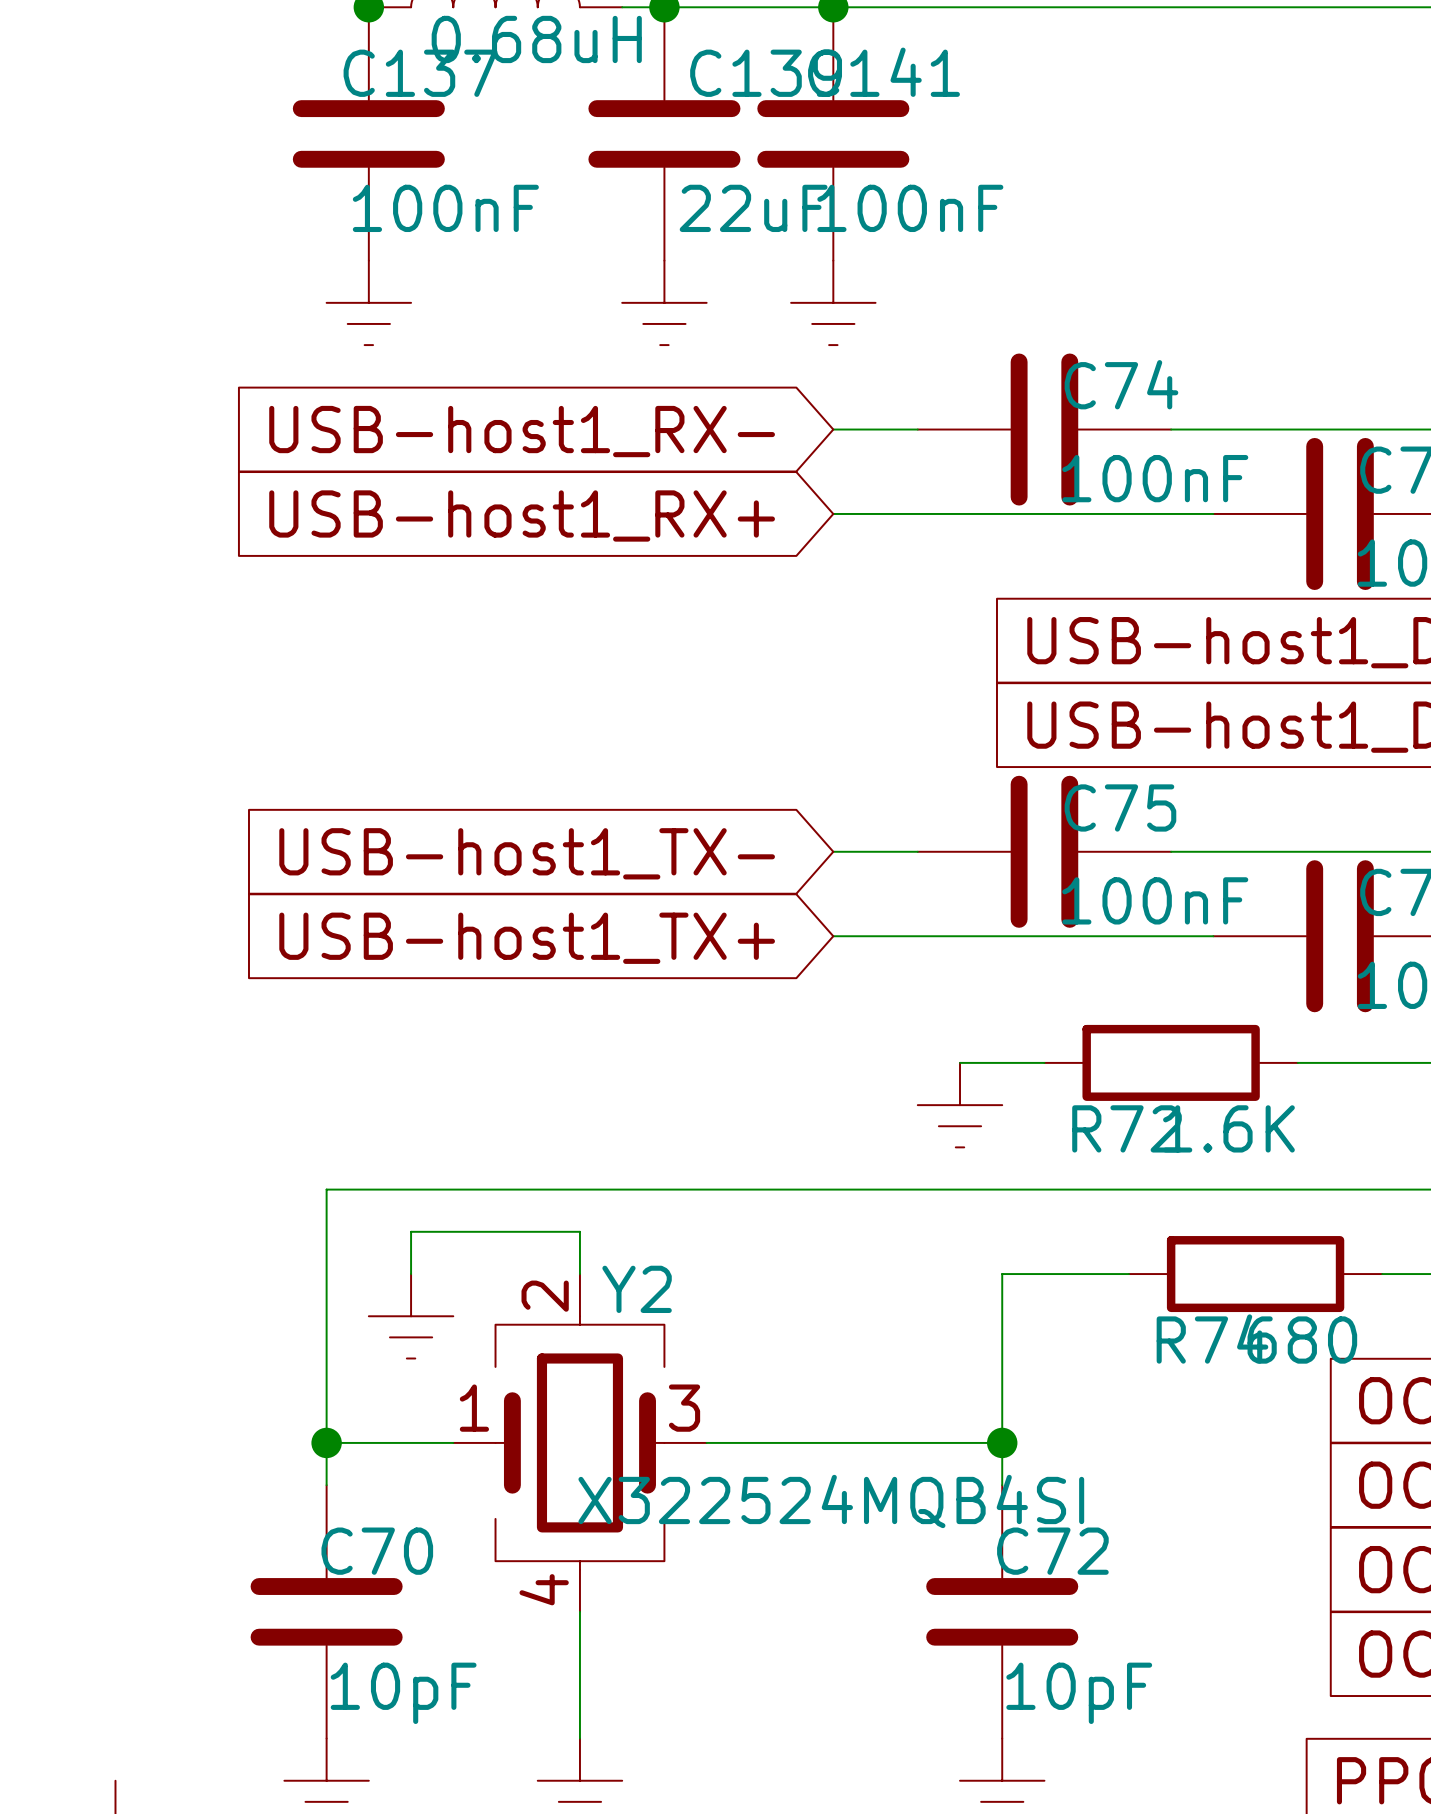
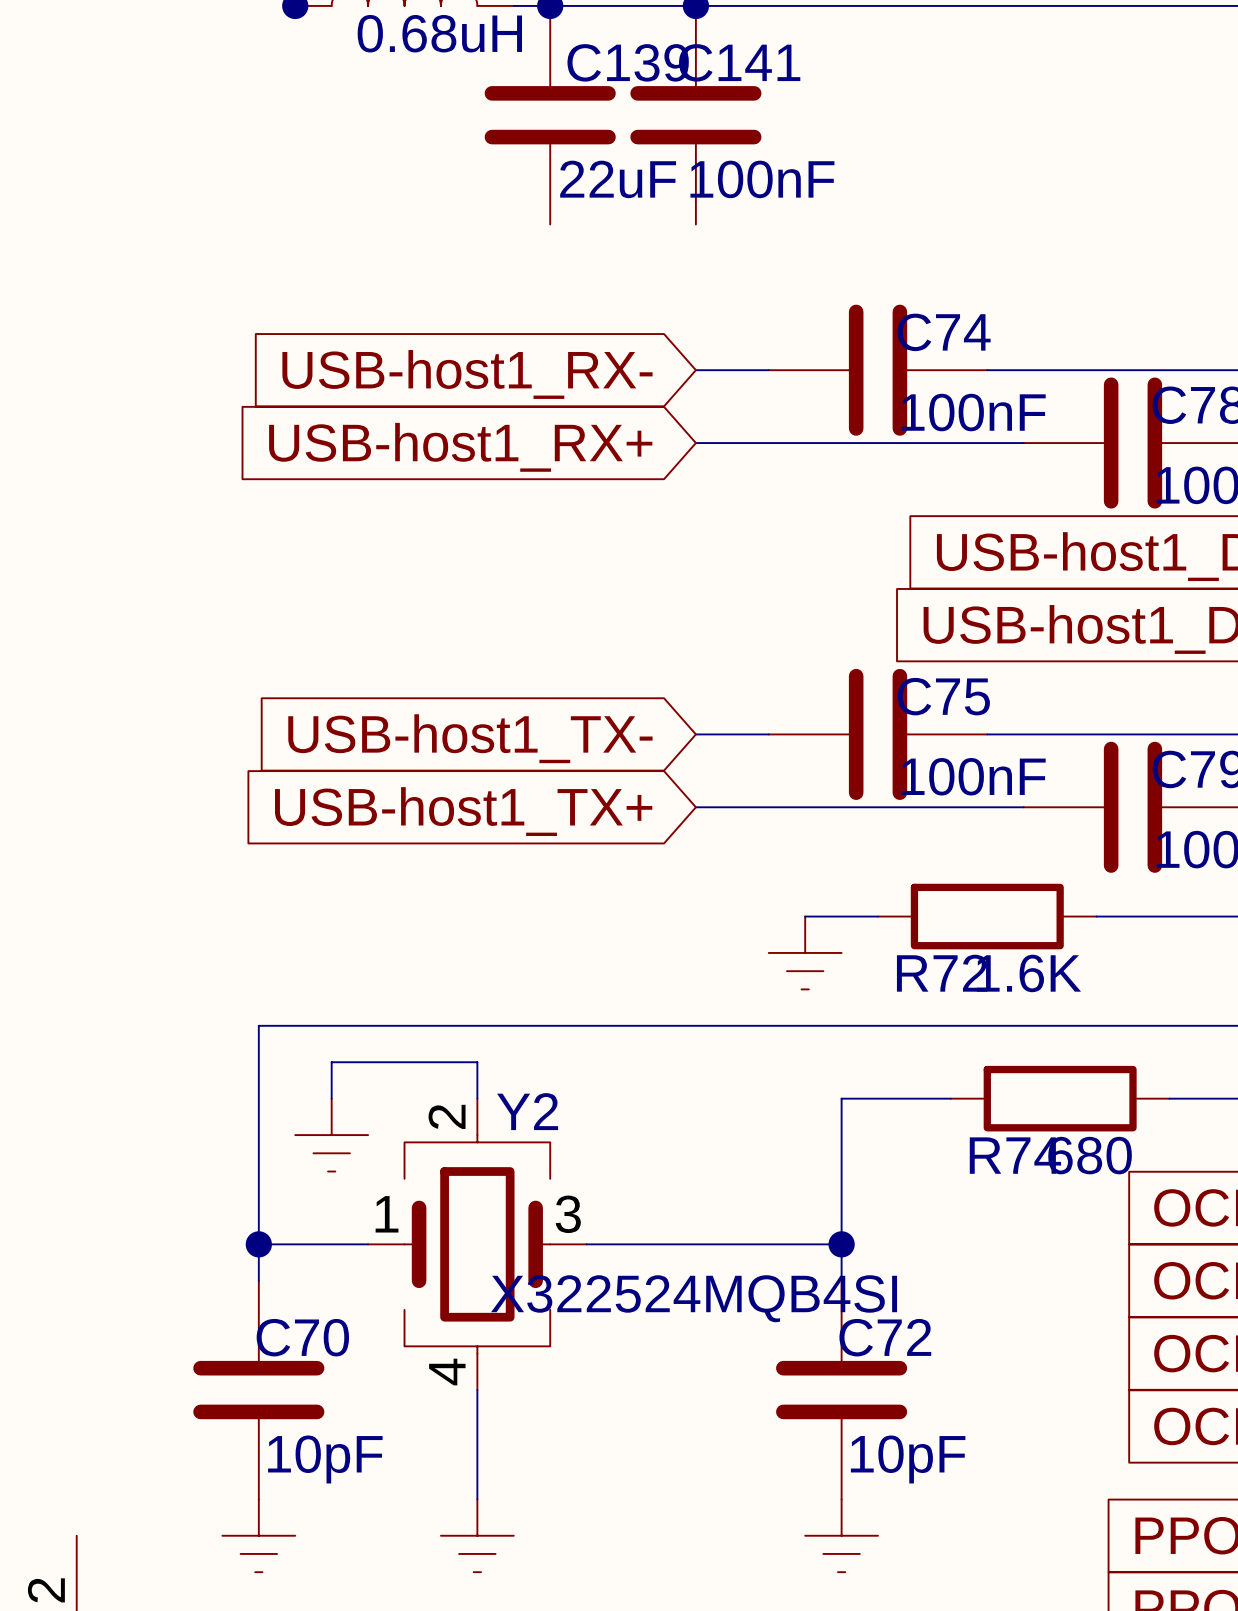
C137: 100nF (368, 133) -> none
power symbol: (368, 302) -> none
power symbol: (664, 302) -> none
power symbol: (833, 302) -> none

